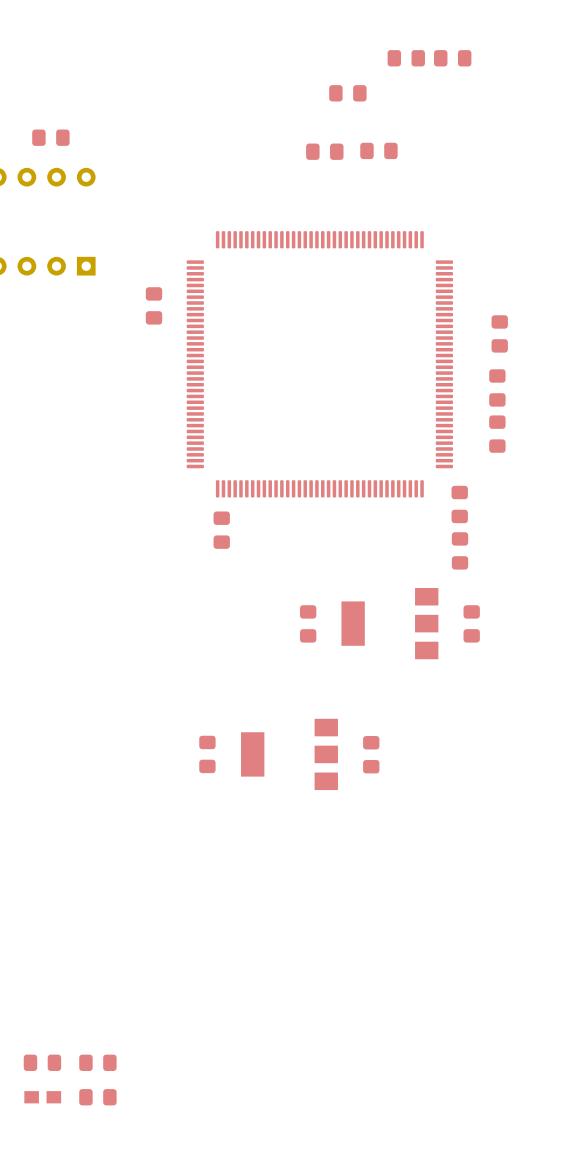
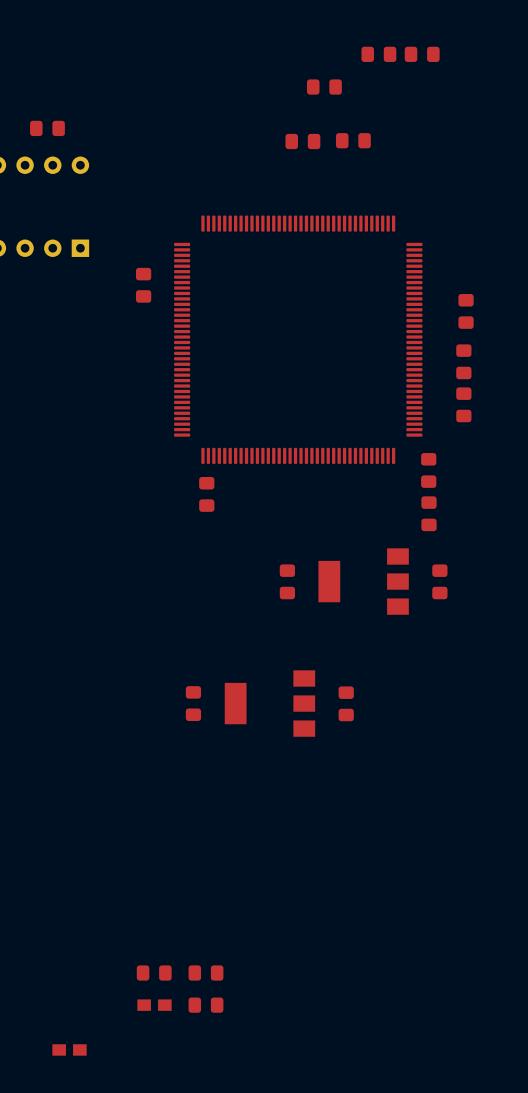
part: none -> (154, 973)
part: none -> (205, 973)
part: (42, 1062) -> none
part: (97, 1062) -> none
part: none -> (154, 1005)
part: none -> (205, 1005)
part position: (42, 1097) -> (69, 1049)
part: (97, 1097) -> none

